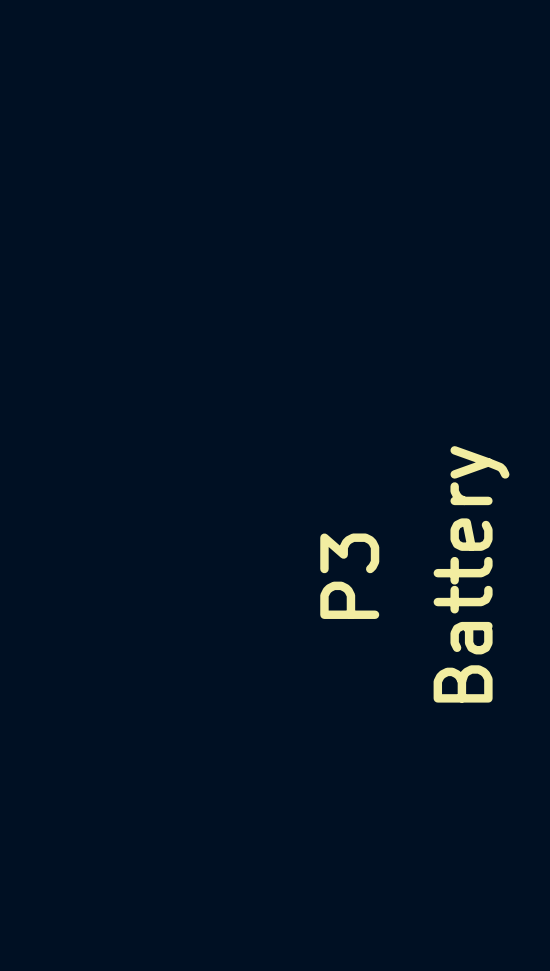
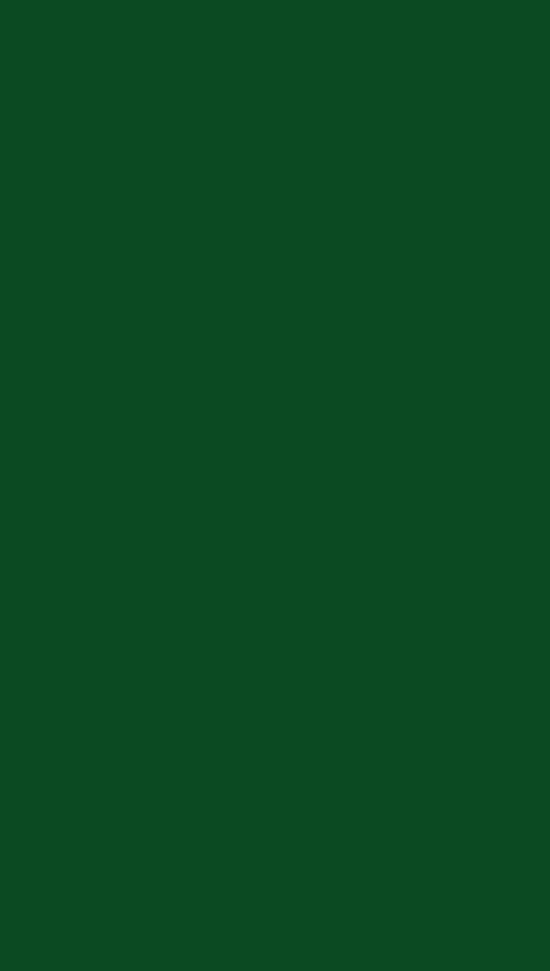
P3 value: Battery (471, 574) -> none
P3 name: P3 (349, 576) -> none

